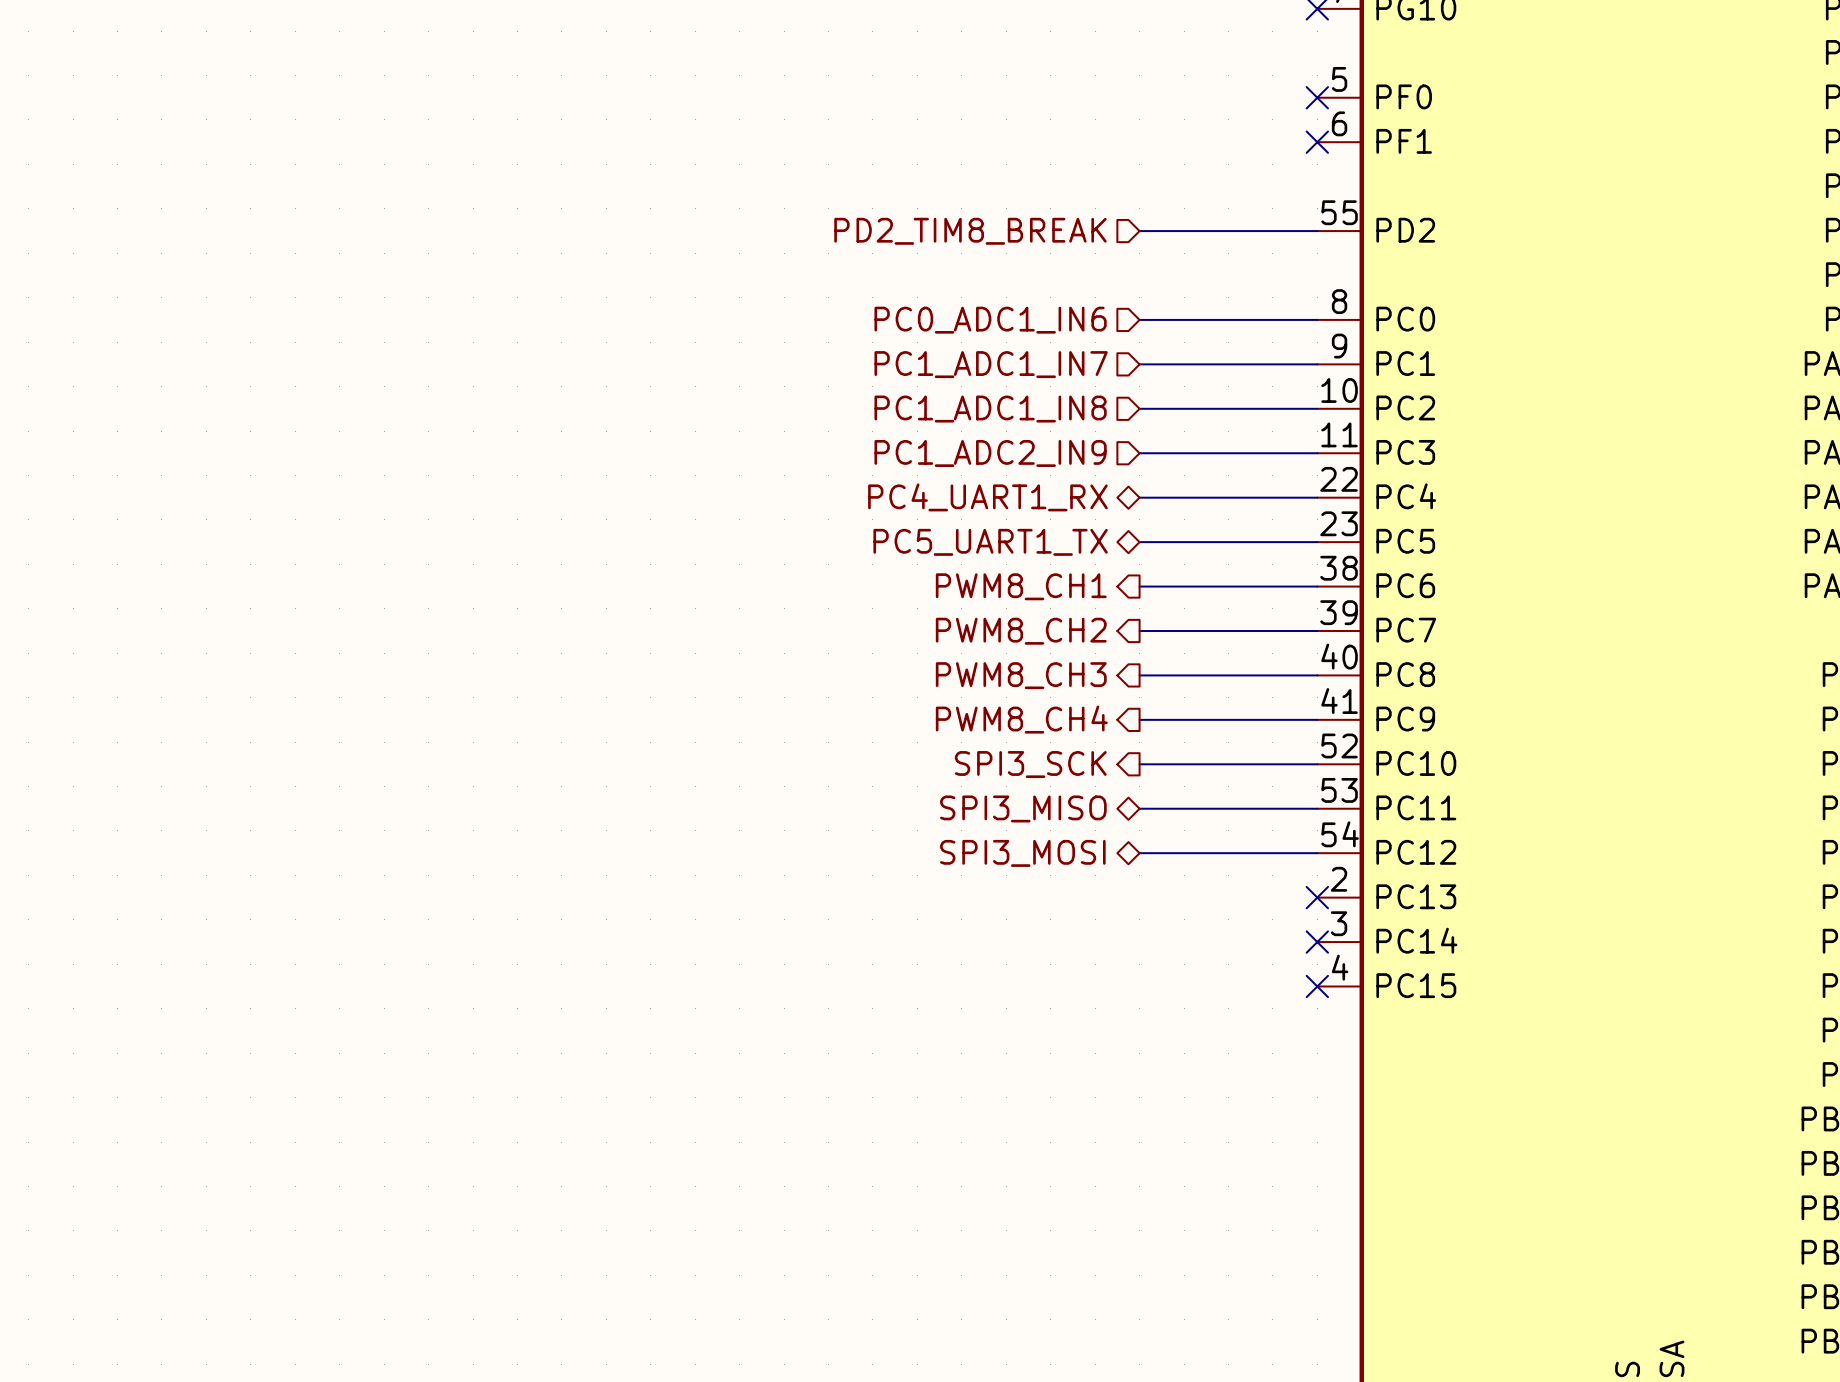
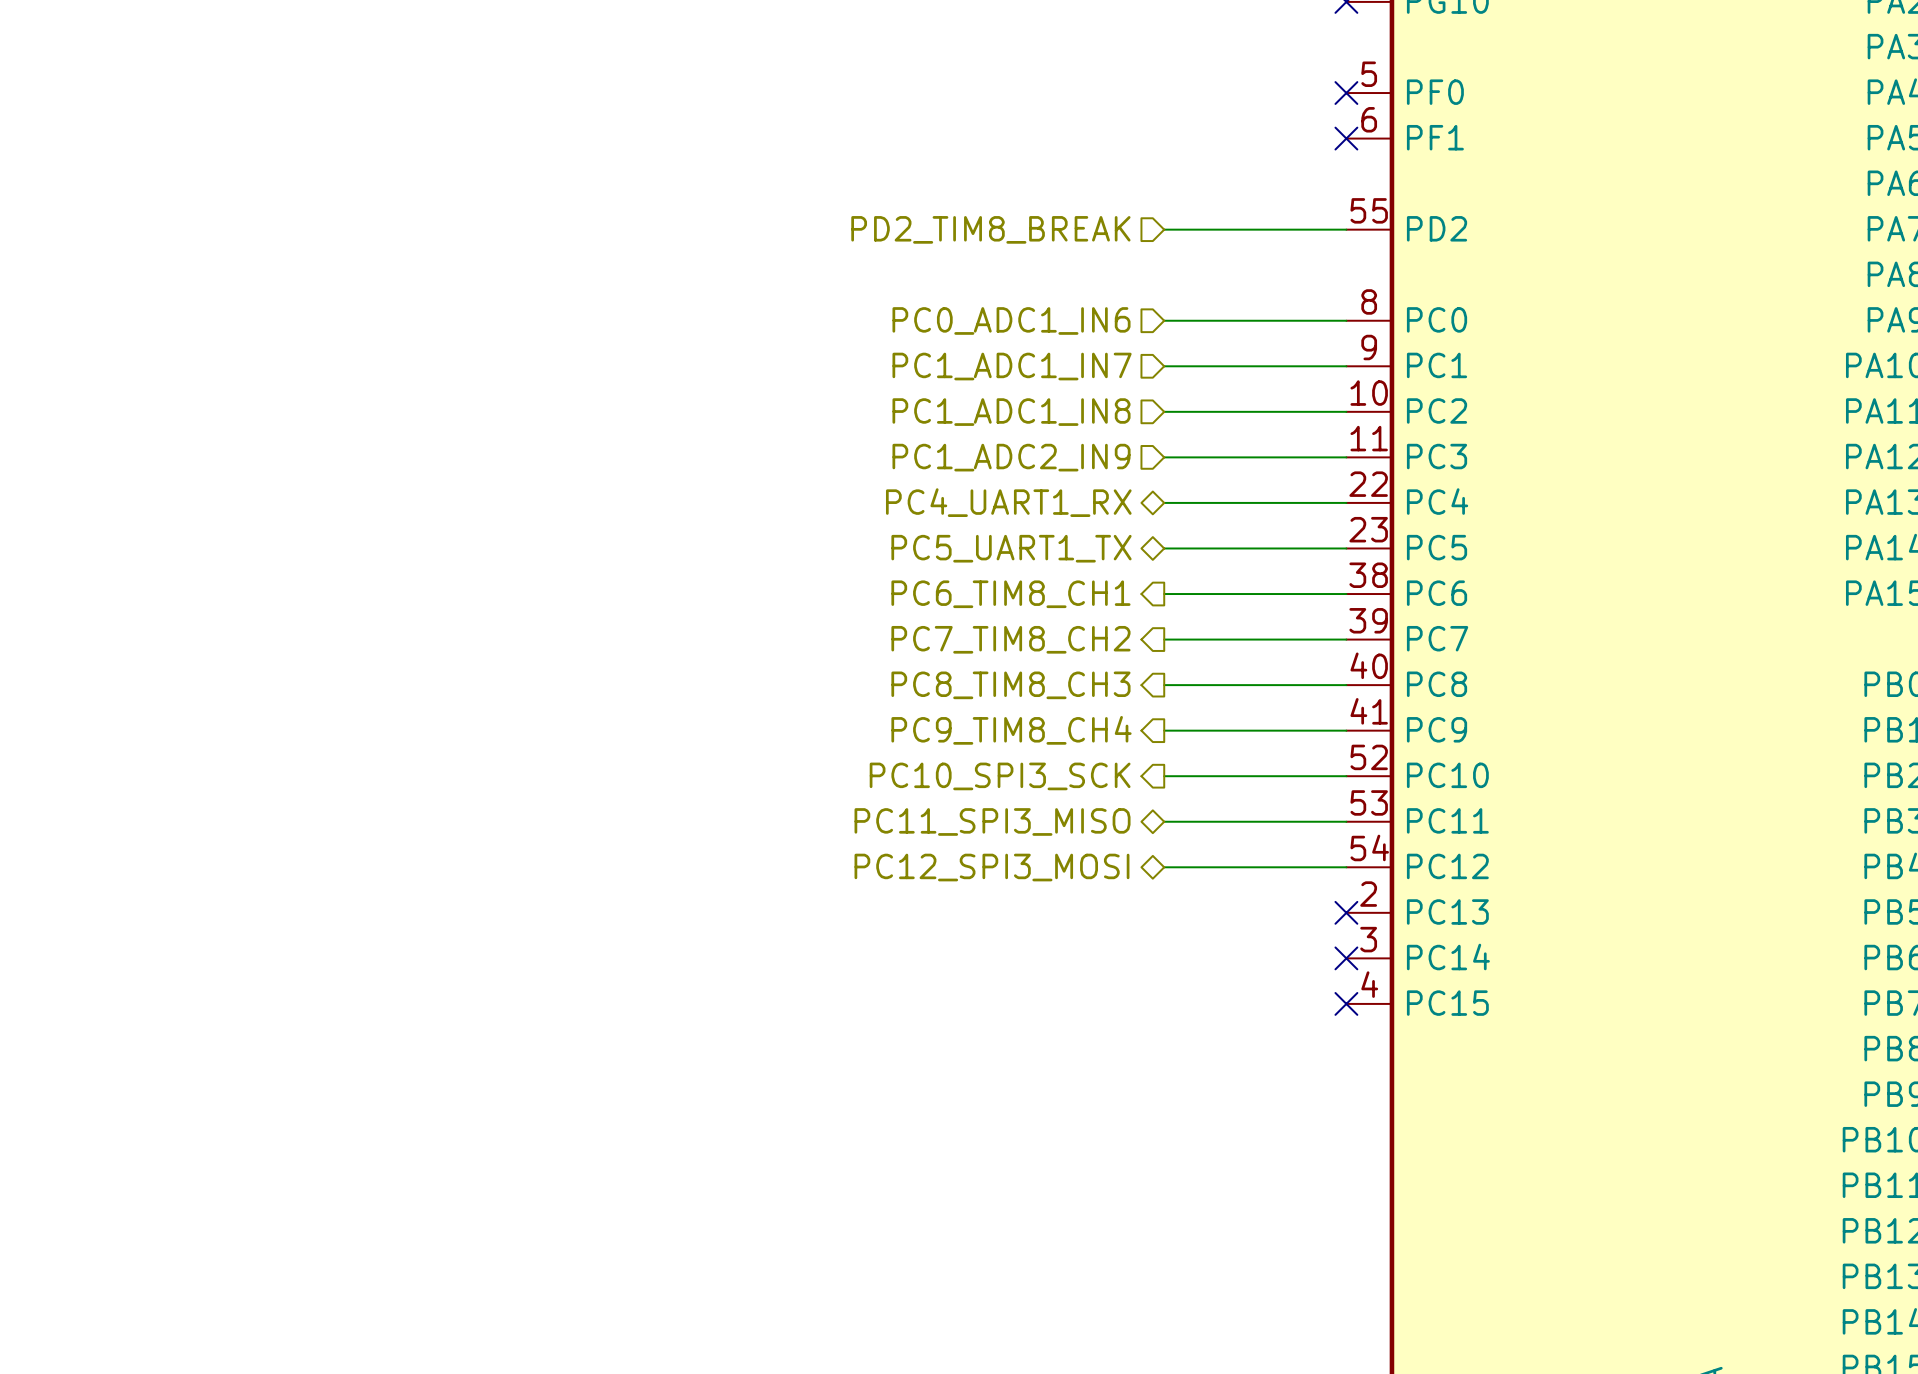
hierarchical label: PWM8_CH1 (1021, 586) -> PC6_TIM8_CH1 (1010, 594)
hierarchical label: PWM8_CH2 (1021, 631) -> PC7_TIM8_CH2 (1010, 639)
hierarchical label: PWM8_CH3 (1021, 675) -> PC8_TIM8_CH3 (1010, 685)
hierarchical label: PWM8_CH4 (1021, 719) -> PC9_TIM8_CH4 (1011, 730)
hierarchical label: SPI3_SCK (1030, 764) -> PC10_SPI3_SCK (1000, 776)
hierarchical label: SPI3_MISO (1023, 808) -> PC11_SPI3_MISO (992, 821)
hierarchical label: SPI3_MOSI (1022, 853) -> PC12_SPI3_MOSI (991, 867)

